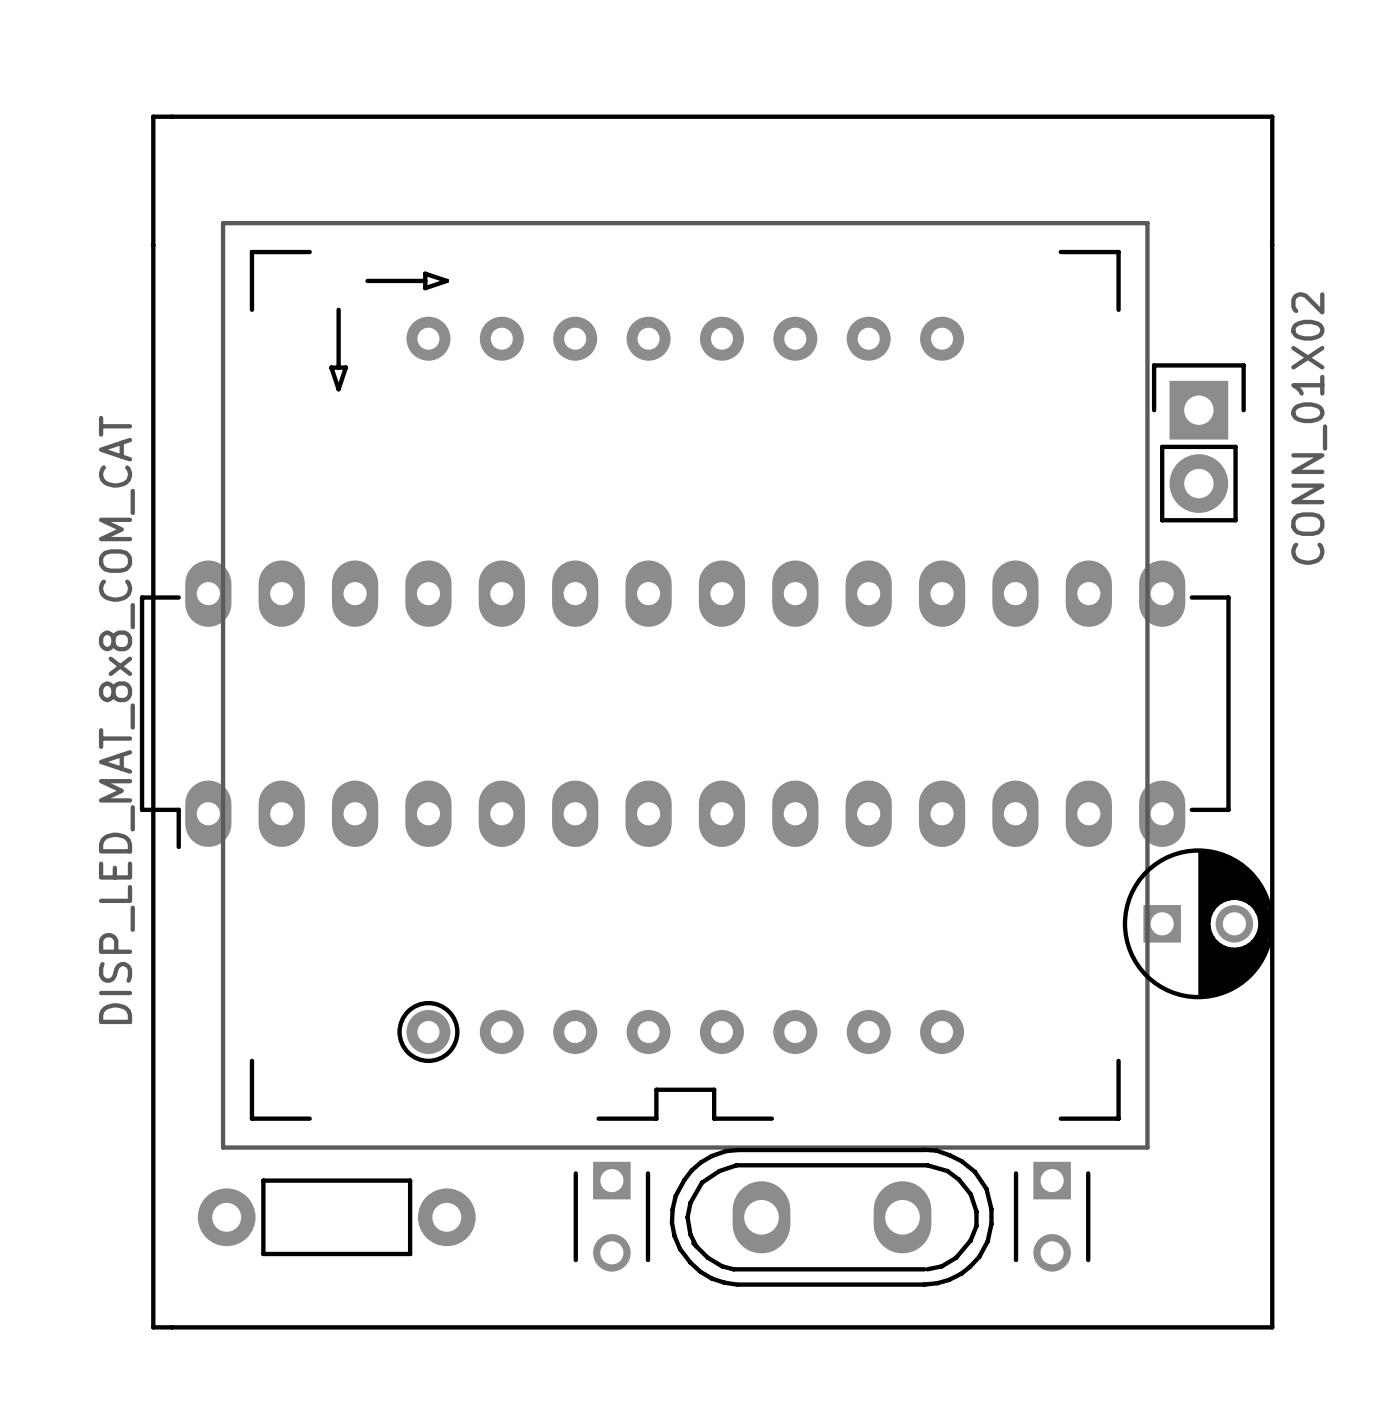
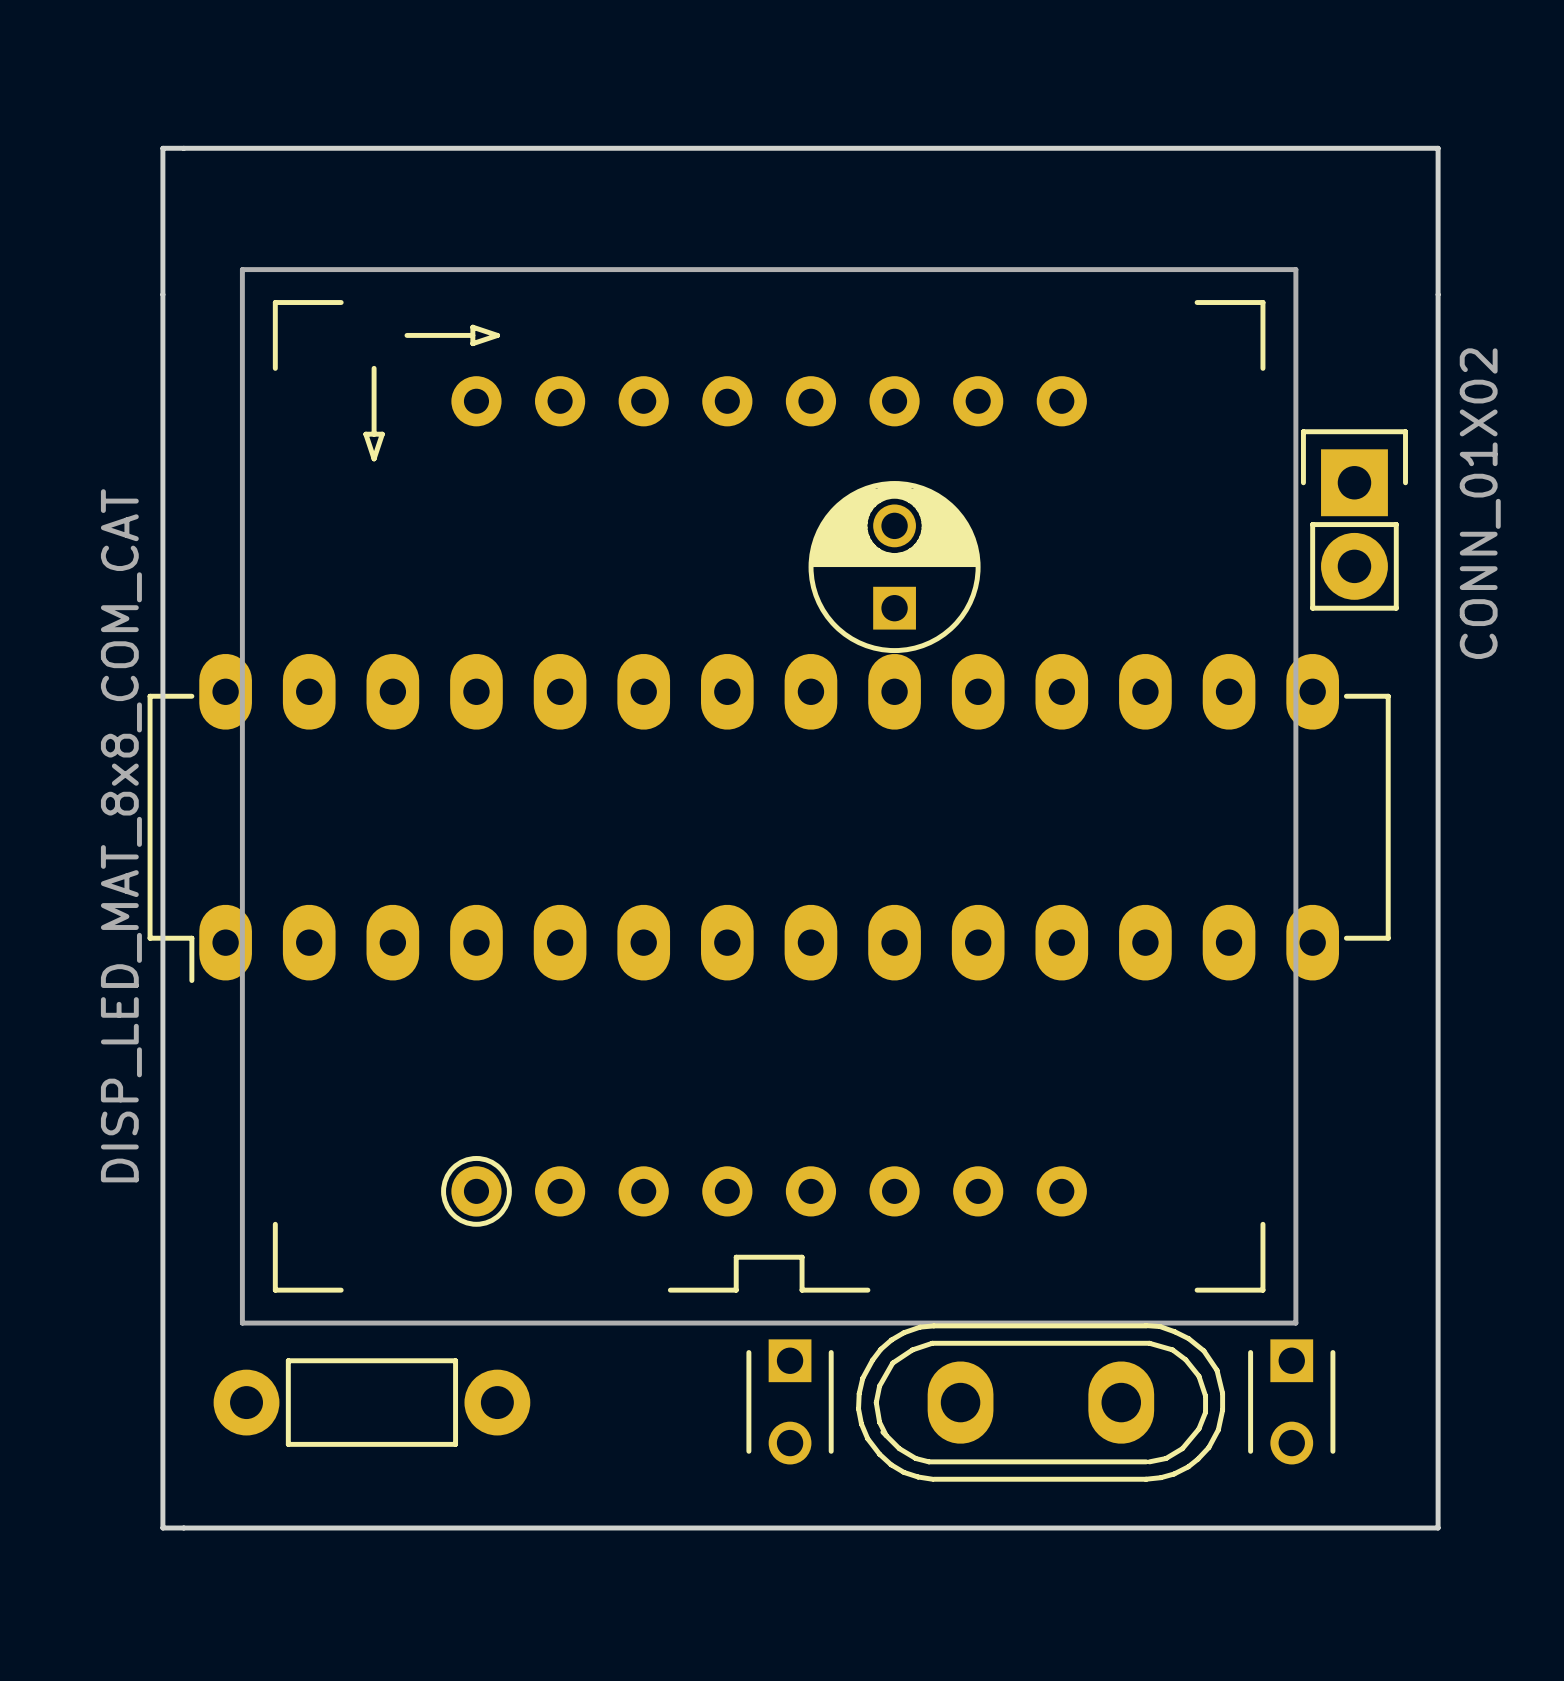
part rotation: 0° (1198, 923) -> 90° counterclockwise (894, 567)
part position: (1198, 923) -> (894, 567)
part position: (611, 1216) -> (790, 1401)
part position: (1052, 1216) -> (1291, 1401)
part position: (831, 1217) -> (1040, 1402)

